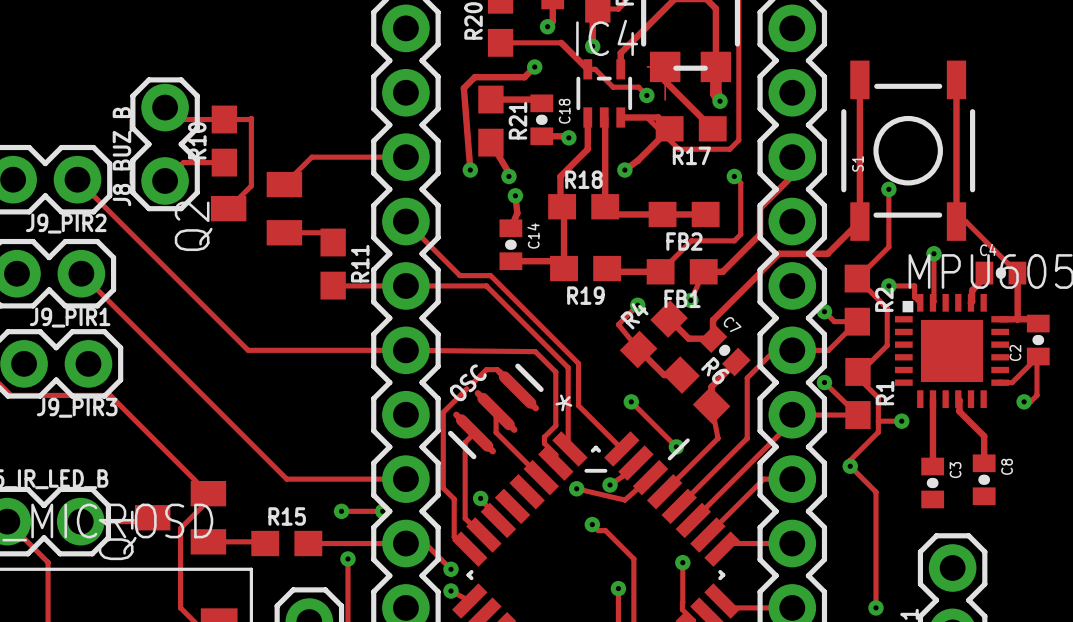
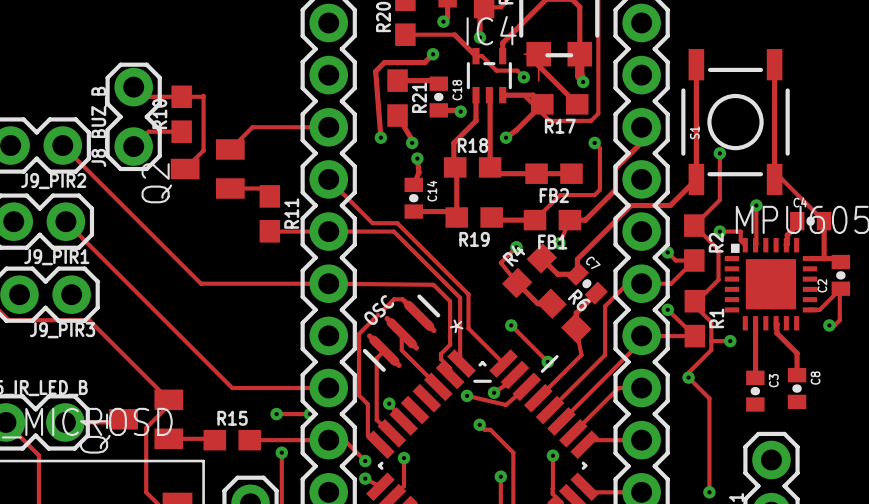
track: none -> (404, 458) (404, 486) (391, 498)
via: none -> (404, 458)

